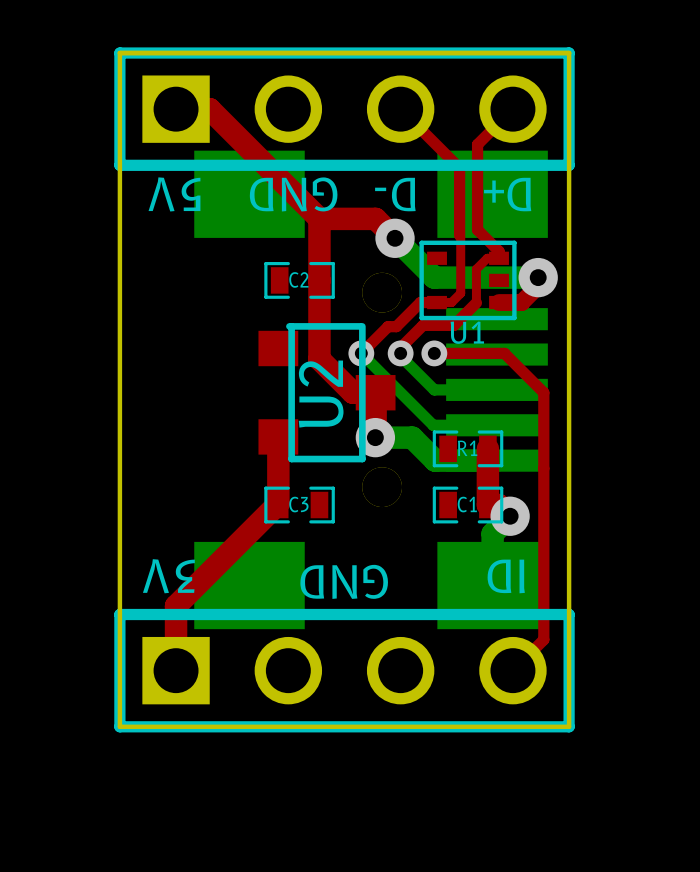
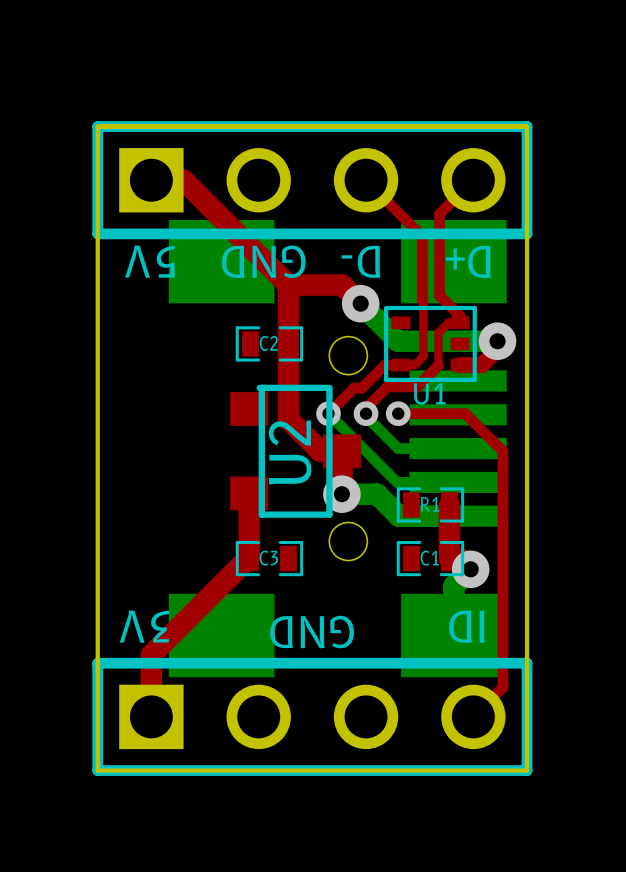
part footprint: [194, 150, 548, 630] -> [168, 219, 507, 678]

